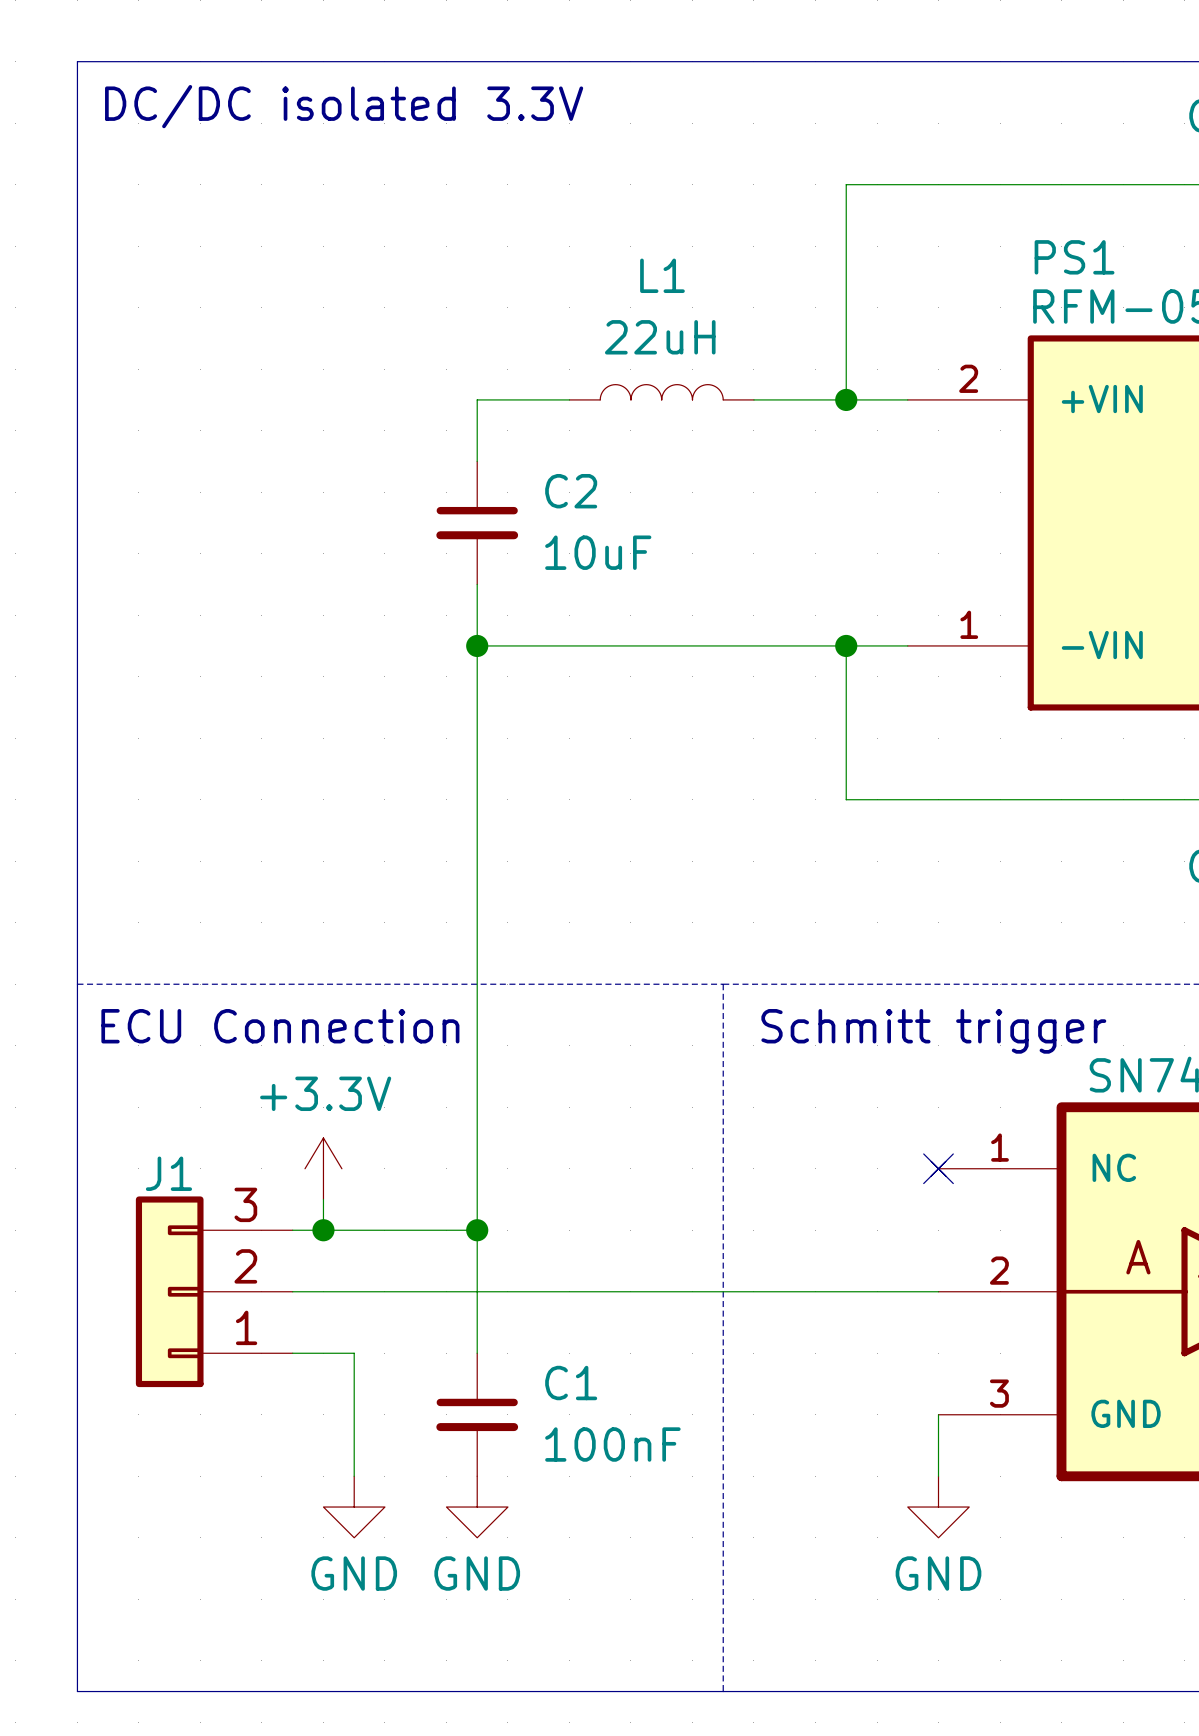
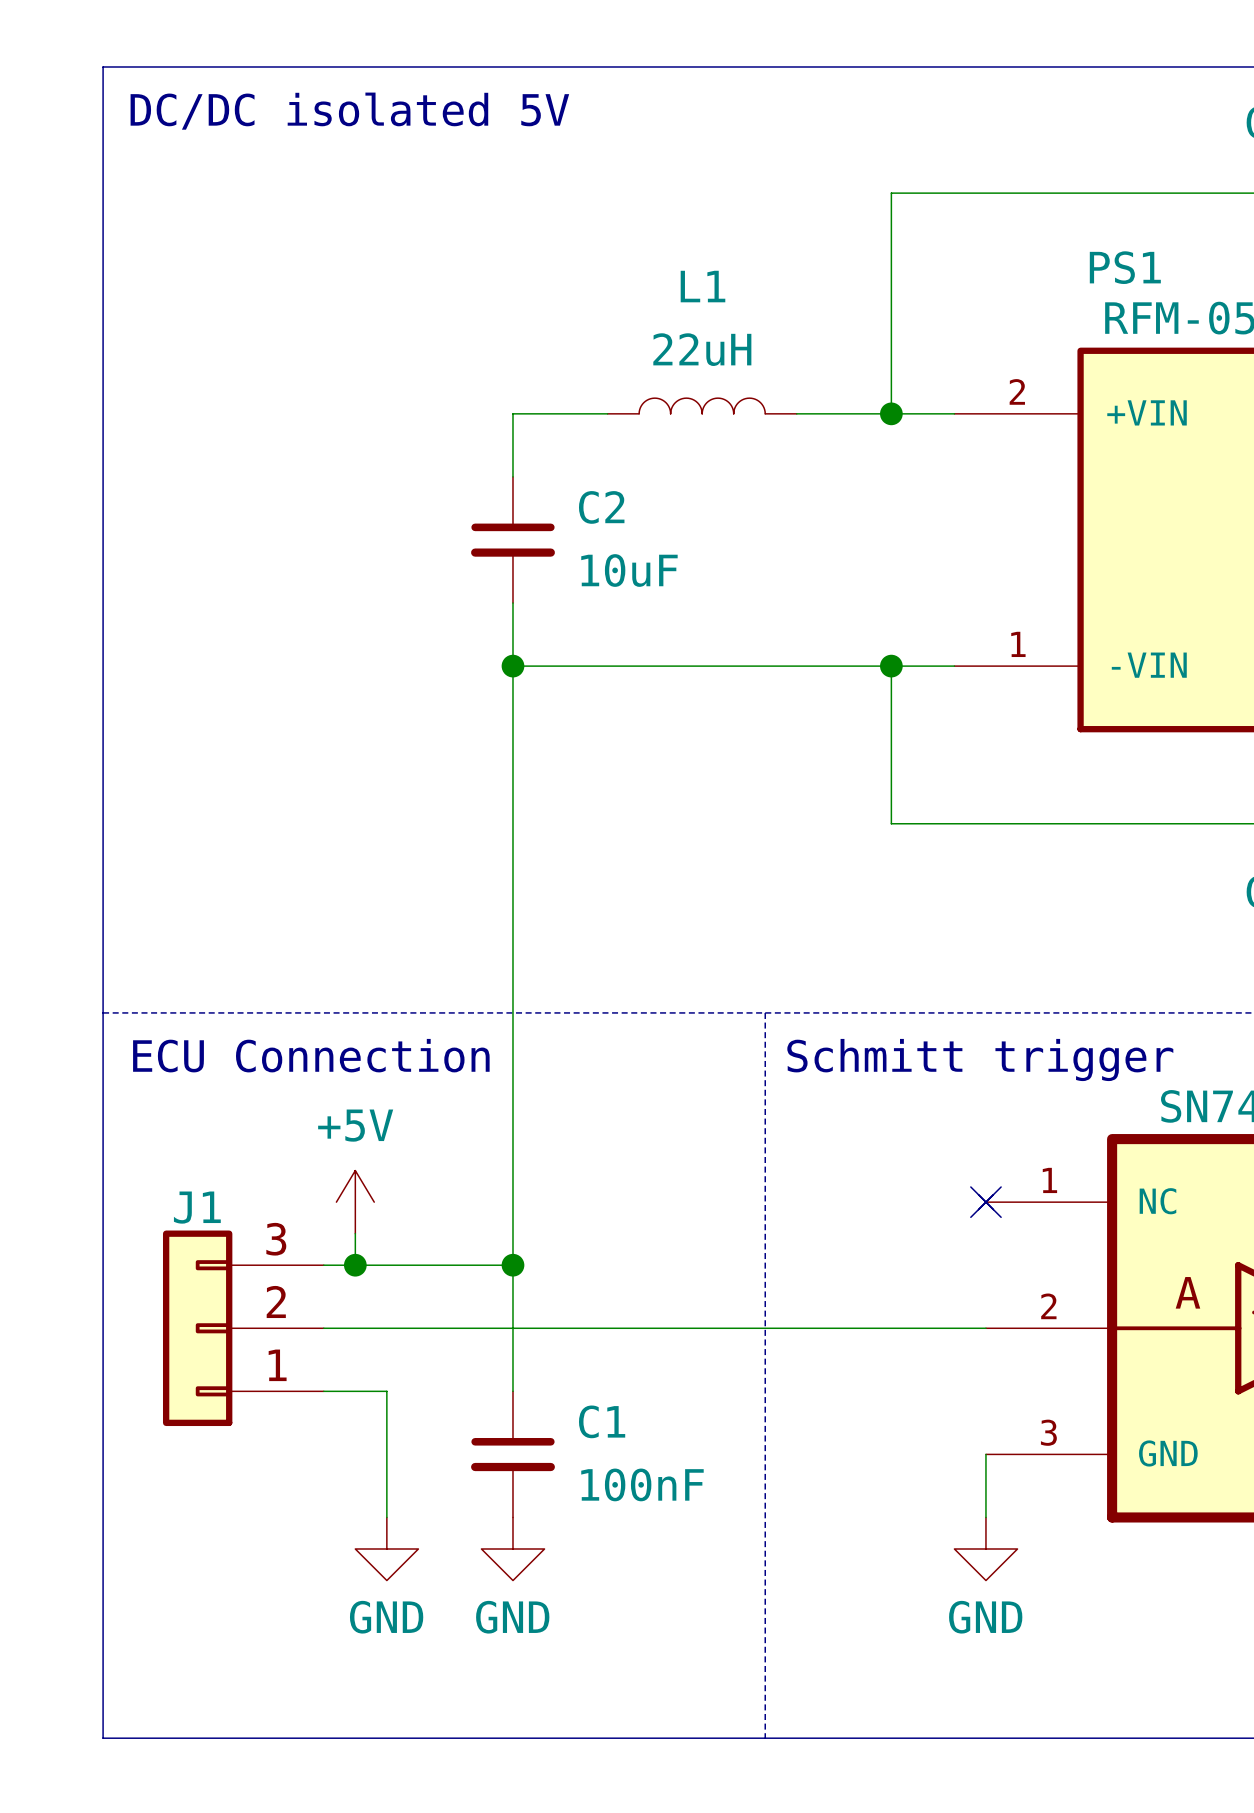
text: DC/DC isolated 3.3V (344, 106) -> DC/DC isolated 5V (349, 111)
power symbol: +3.3V (323, 1168) -> +5V (355, 1202)

